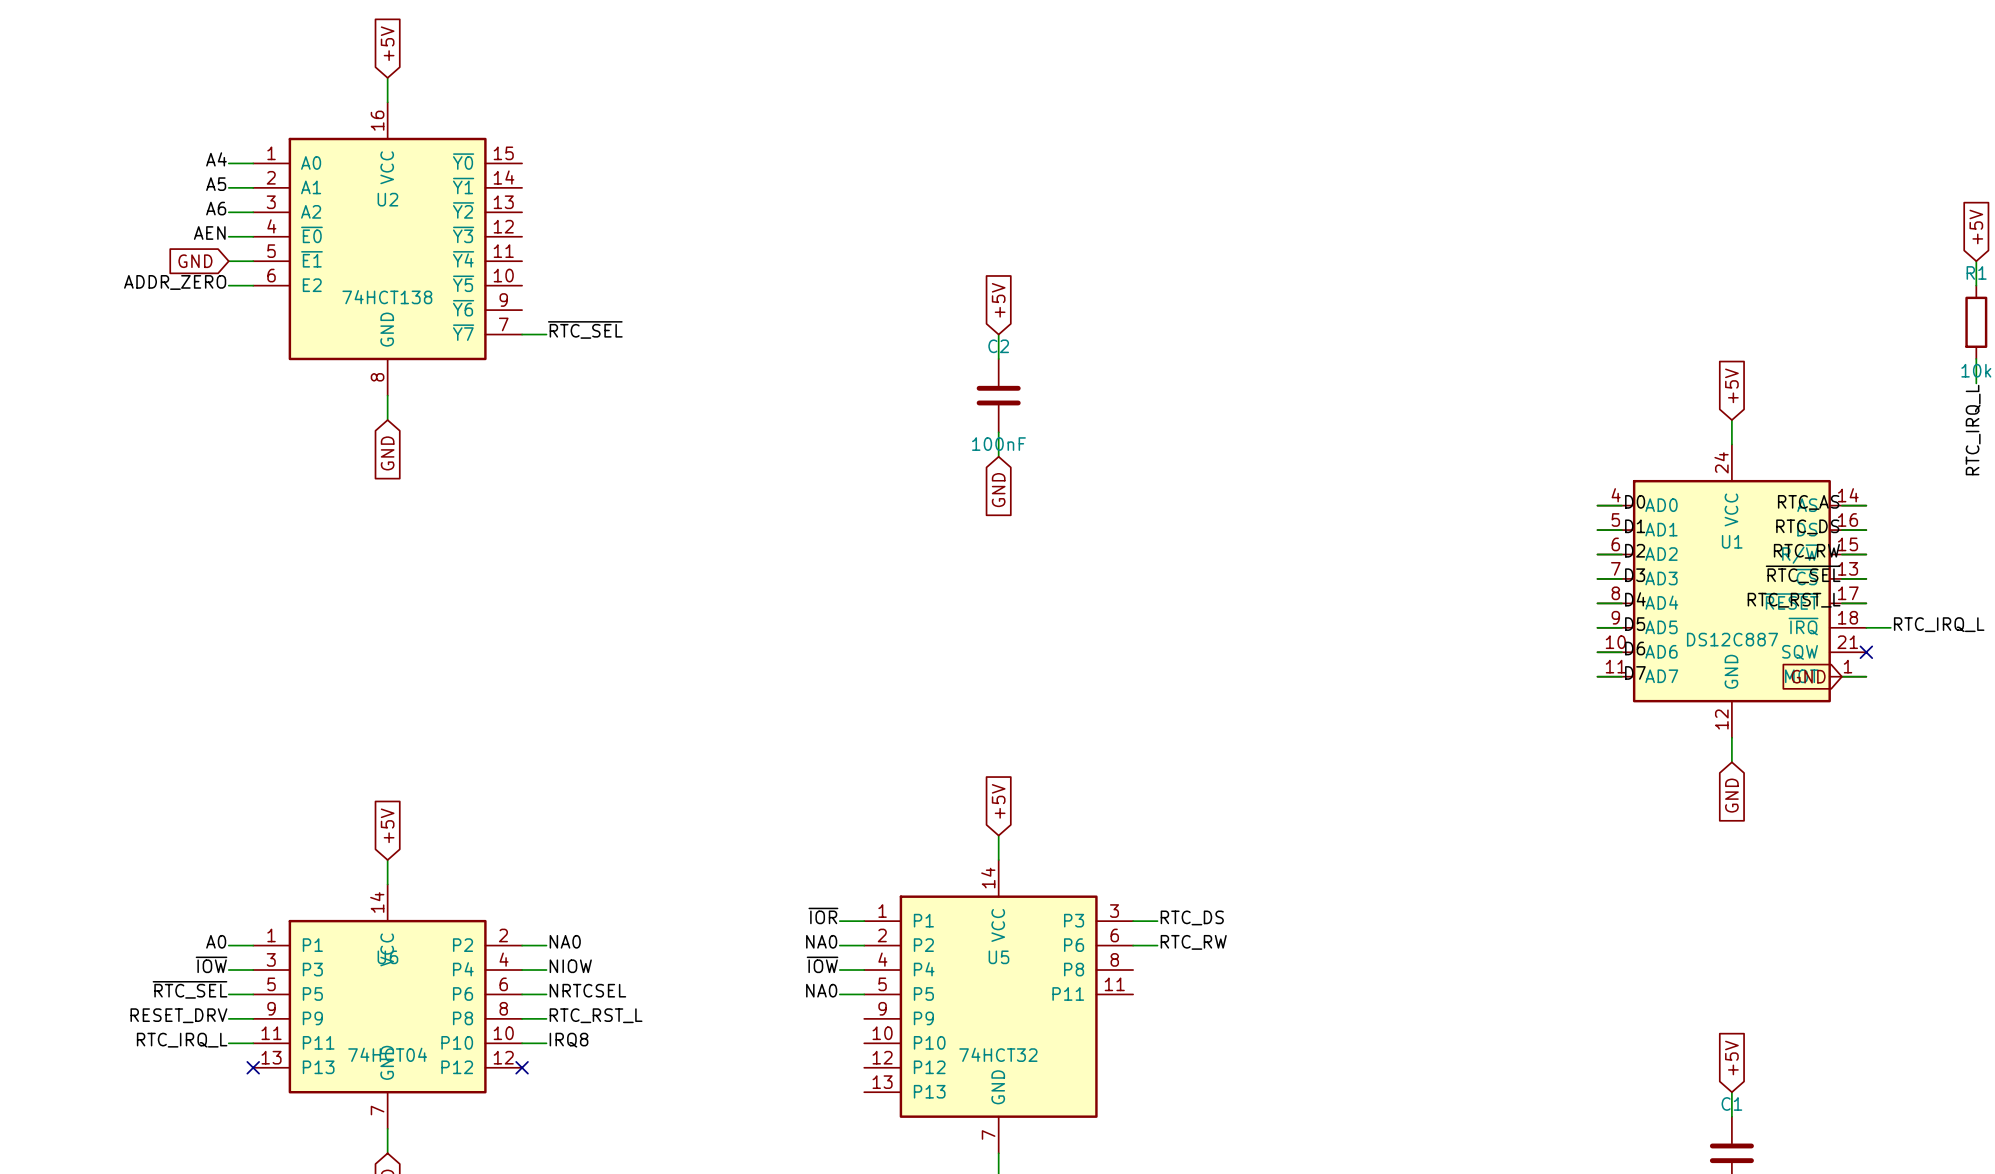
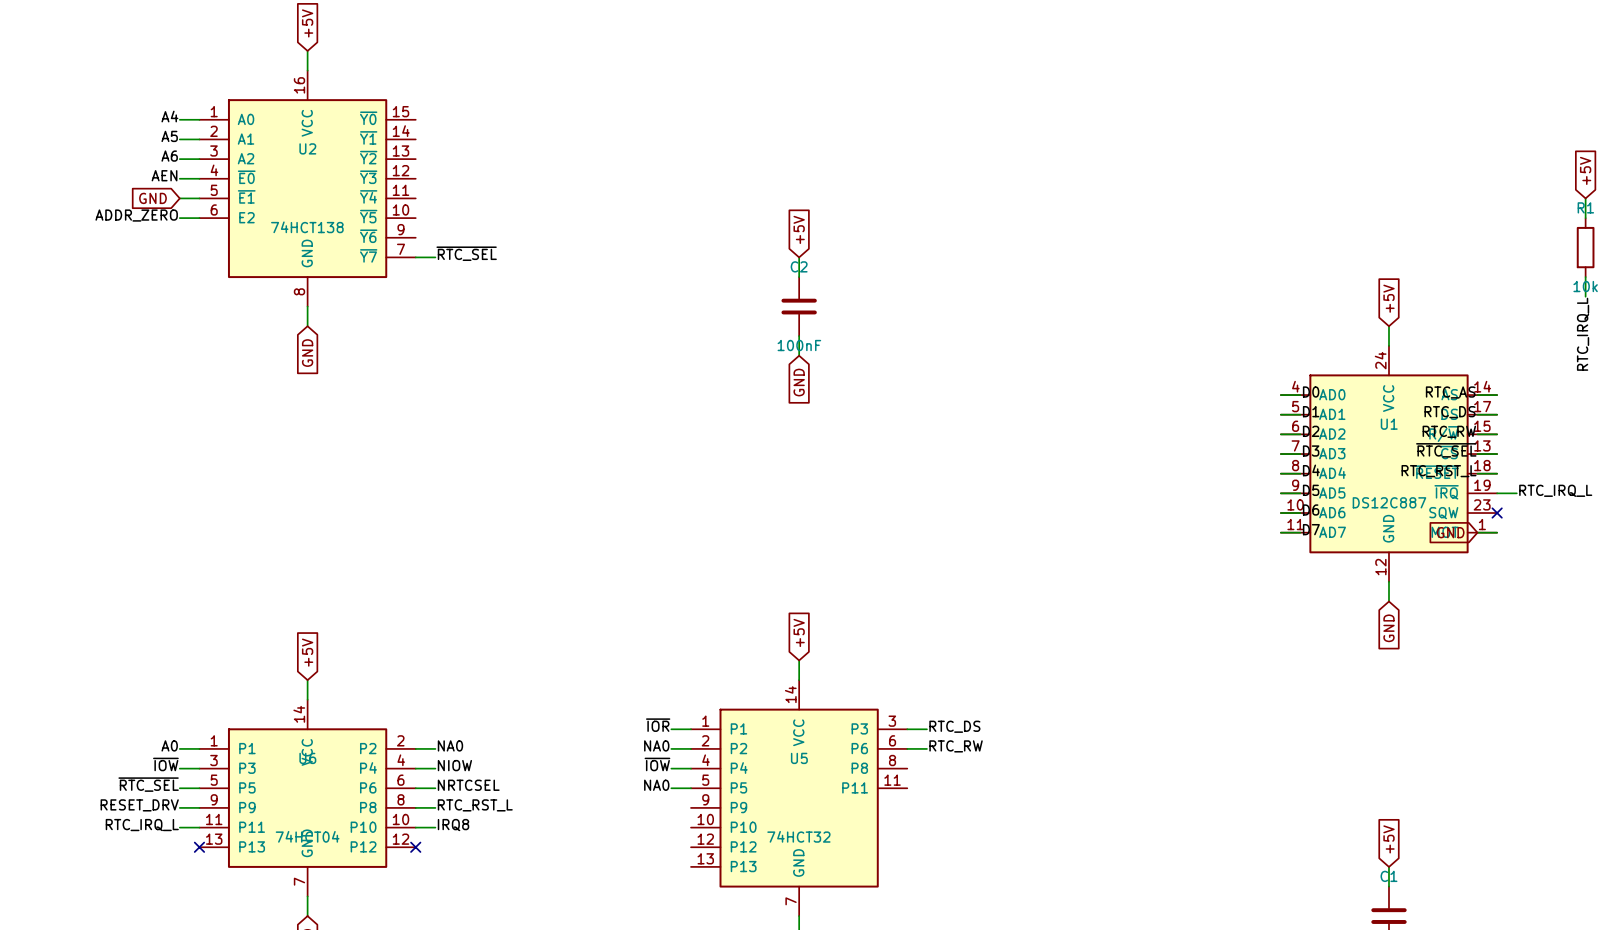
U1 pin number: 16 (1848, 519) -> 17 (1482, 406)
U1 pin number: 17 (1848, 593) -> 18 (1482, 465)
U1 pin number: 18 (1848, 617) -> 19 (1482, 485)
U1 pin number: 21 (1847, 642) -> 23 (1482, 504)

